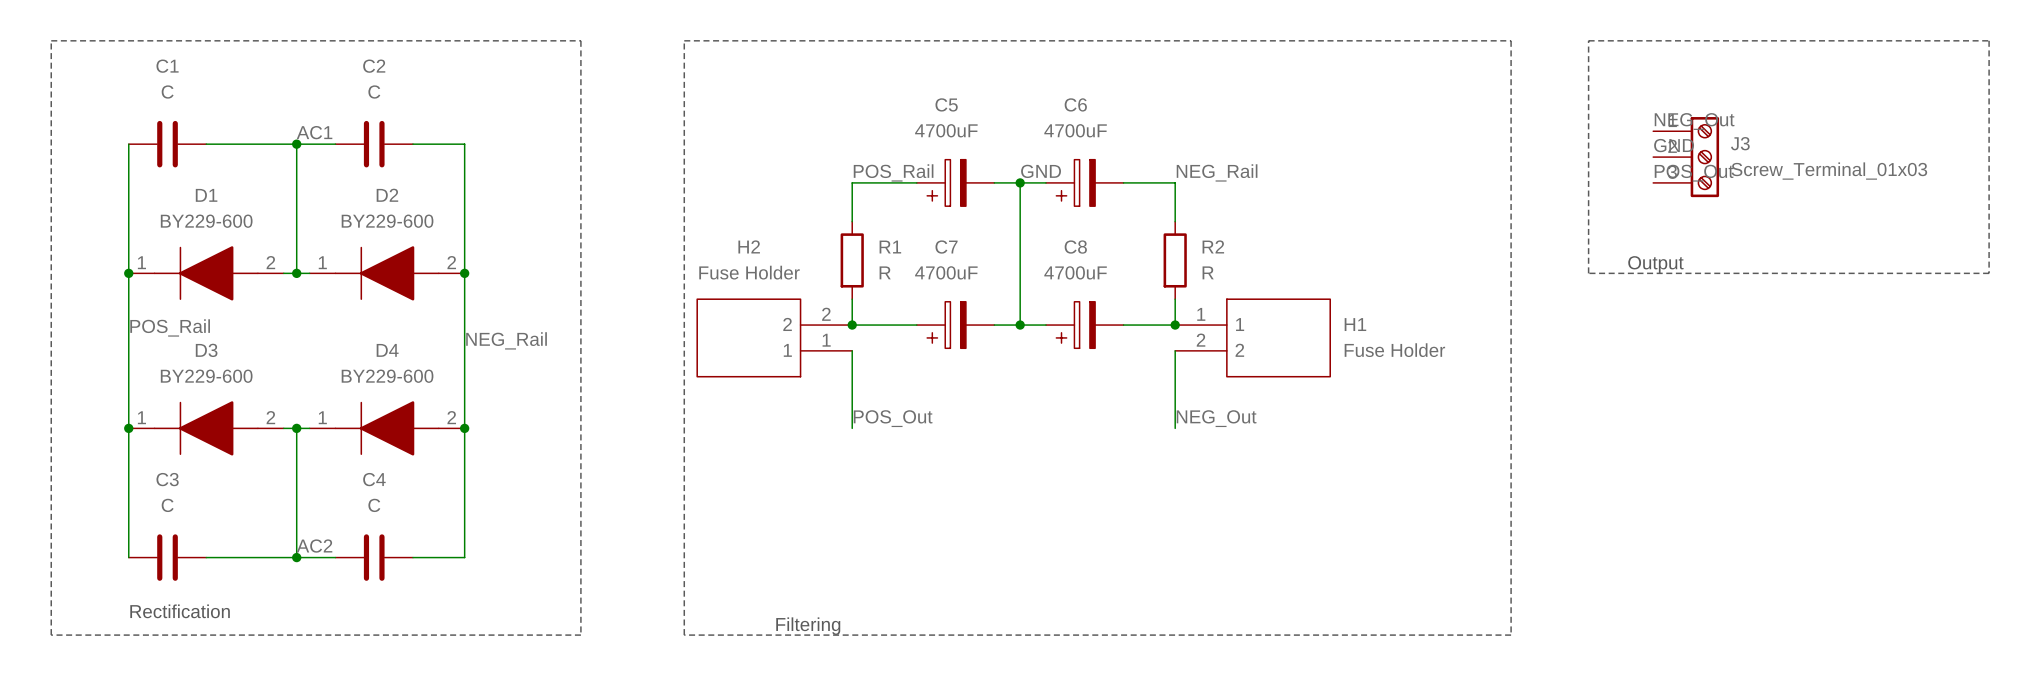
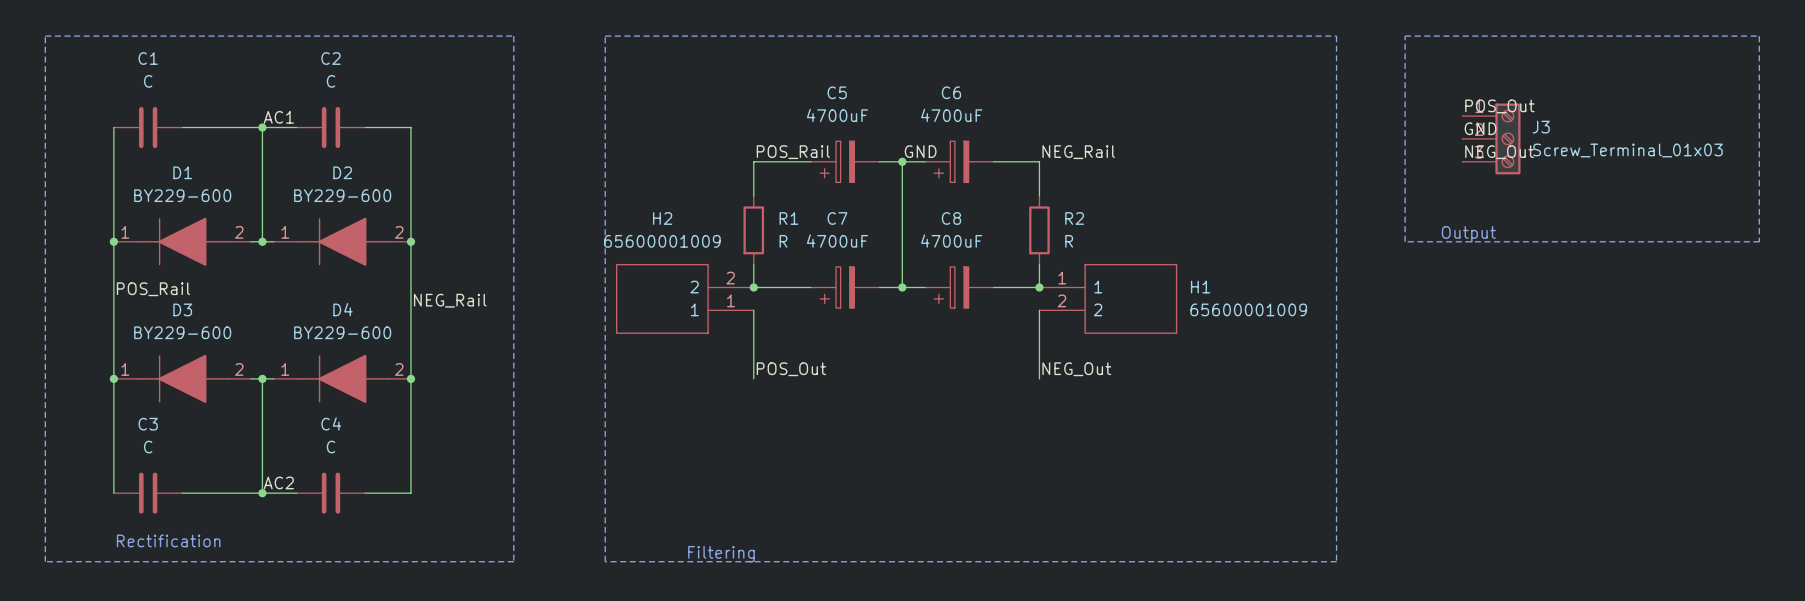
label: NEG_Out (1694, 121) -> POS_Out (1499, 106)
label: POS_Out (1694, 173) -> NEG_Out (1499, 152)
H2 value: Fuse Holder (749, 272) -> 65600001009 (662, 241)
H1 value: Fuse Holder (1394, 350) -> 65600001009 (1248, 309)

